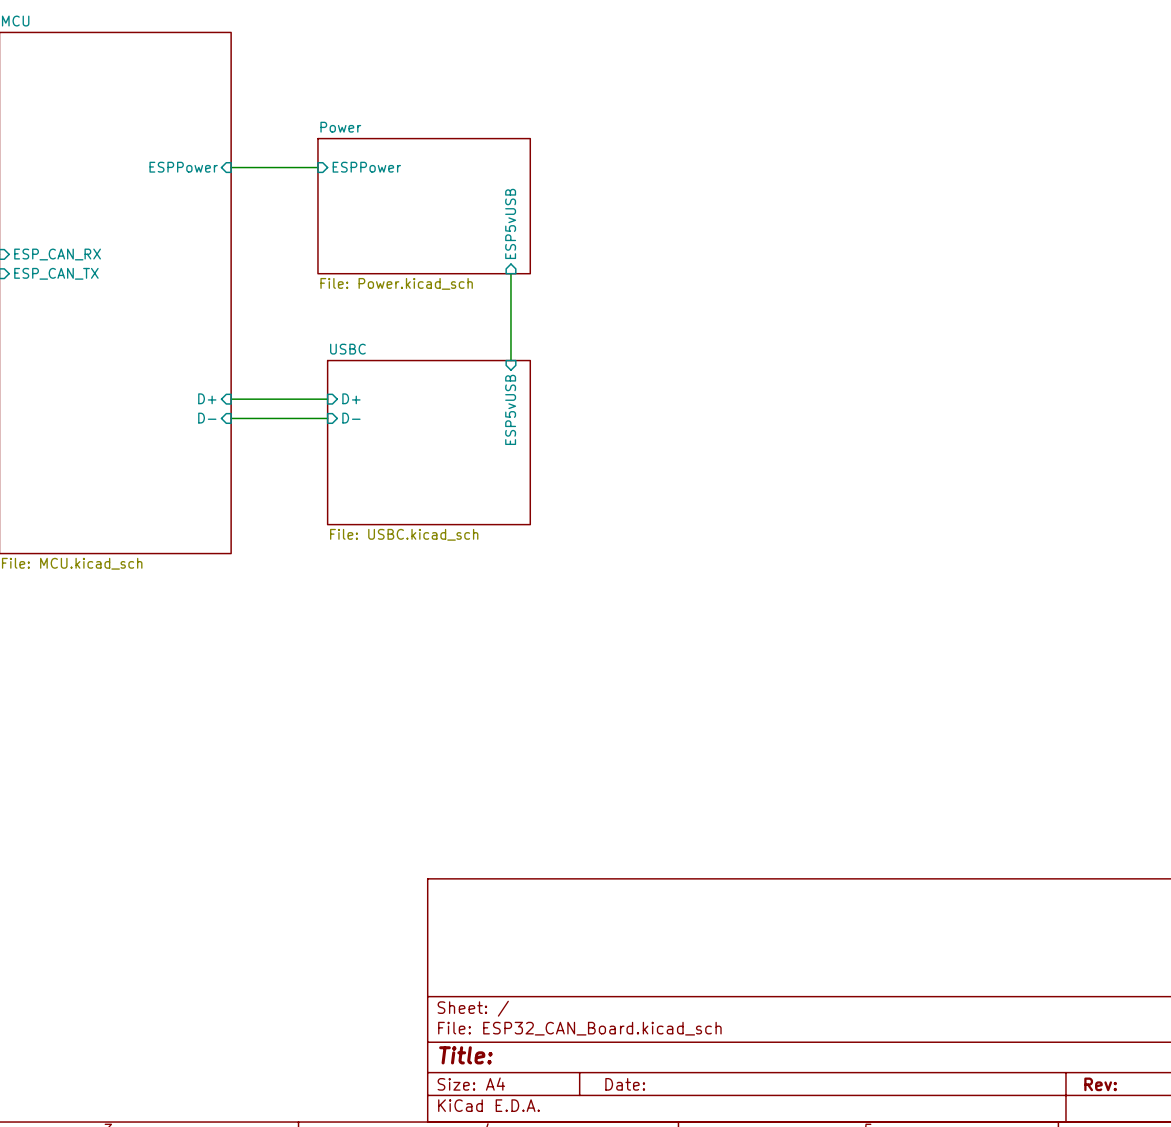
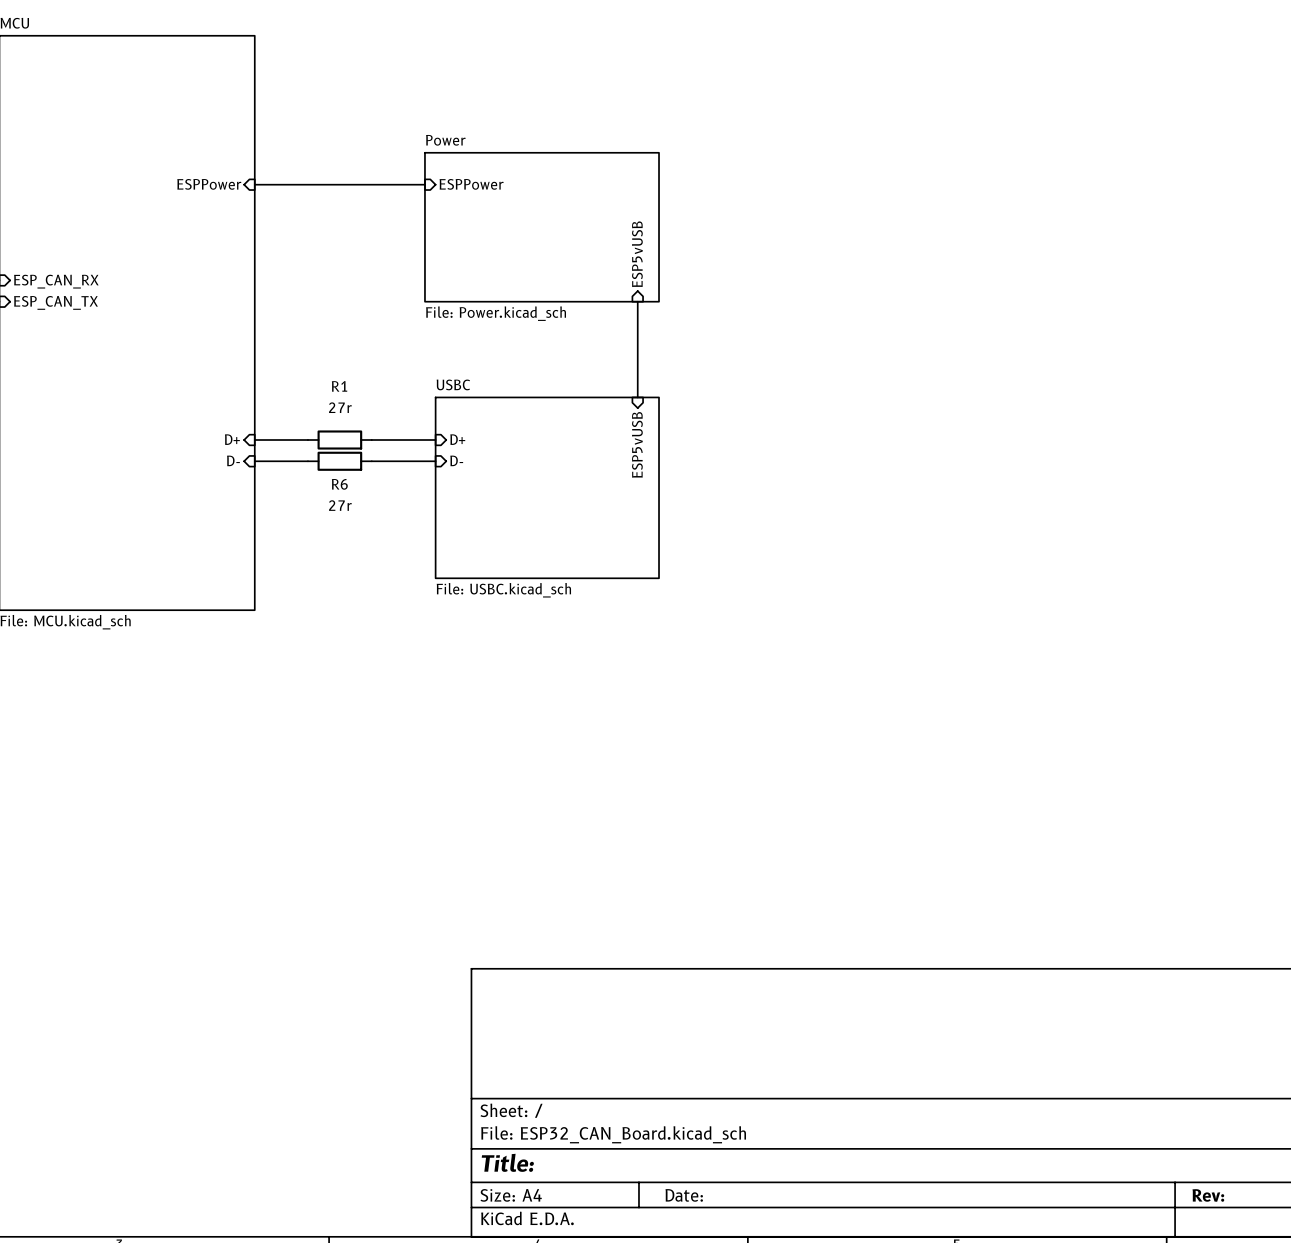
wire: none -> (350, 184) (424, 184)
sheet pin position: ESPPower (366, 167) -> ESPPower (471, 184)
sheet Power position: (424, 206) -> (541, 227)
sheet pin: ESP5vUSB (510, 223) -> none
sheet pin: none -> ESP5vUSB (637, 254)
wire: (510, 273) (510, 360) -> (637, 301) (637, 397)
sheet pin position: D+ (351, 398) -> D+ (457, 439)
wire: (279, 399) (327, 399) -> none
R1: none -> 27r (339, 440)
wire: none -> (371, 440) (435, 440)
sheet pin: ESP5vUSB (510, 409) -> none
sheet pin: none -> ESP5vUSB (637, 444)
wire: (279, 418) (327, 418) -> none
R6: none -> 27r (339, 461)
wire: none -> (371, 461) (435, 461)
sheet pin position: D- (351, 418) -> D- (456, 460)
sheet USBC position: (428, 442) -> (547, 487)

